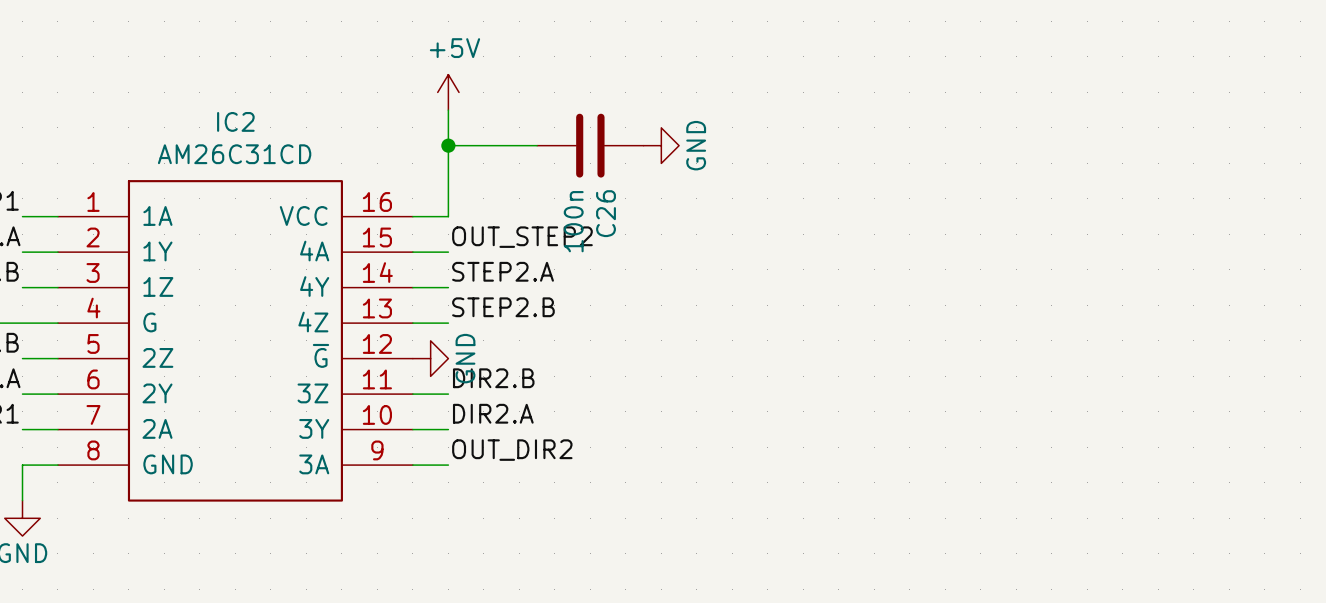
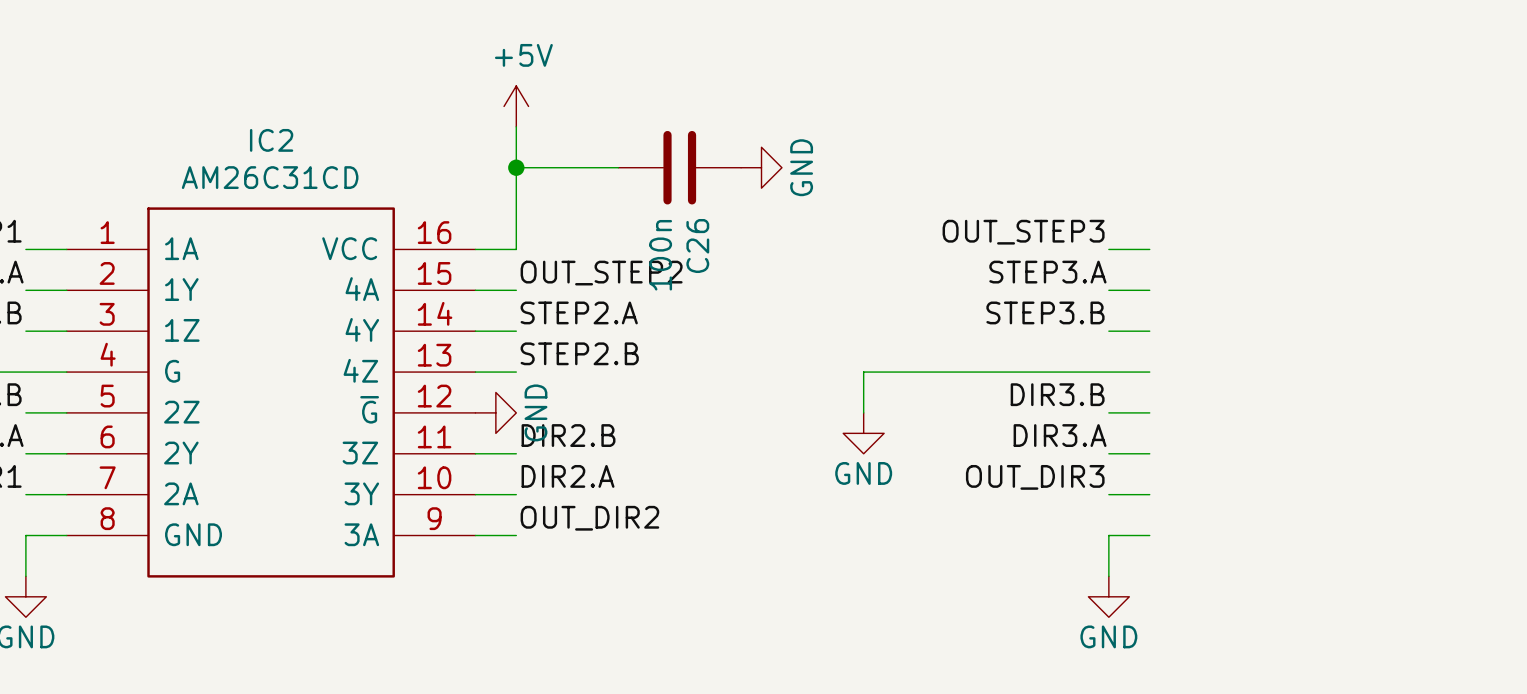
label: none -> OUT_STEP3 (1023, 232)
wire: none -> (1108, 249) (1149, 249)
label: none -> STEP3.A (1047, 272)
wire: none -> (1108, 290) (1149, 290)
label: none -> STEP3.B (1045, 312)
wire: none -> (1108, 331) (1149, 331)
wire: none -> (1149, 372) (863, 372) (863, 412)
label: none -> DIR3.B (1057, 394)
wire: none -> (1108, 412) (1149, 412)
power symbol: none -> GND (863, 433)
label: none -> DIR3.A (1060, 435)
wire: none -> (1108, 453) (1149, 453)
label: none -> OUT_DIR3 (1035, 477)
wire: none -> (1108, 494) (1149, 494)
wire: none -> (1149, 535) (1108, 535) (1108, 576)
power symbol: none -> GND (1108, 596)

